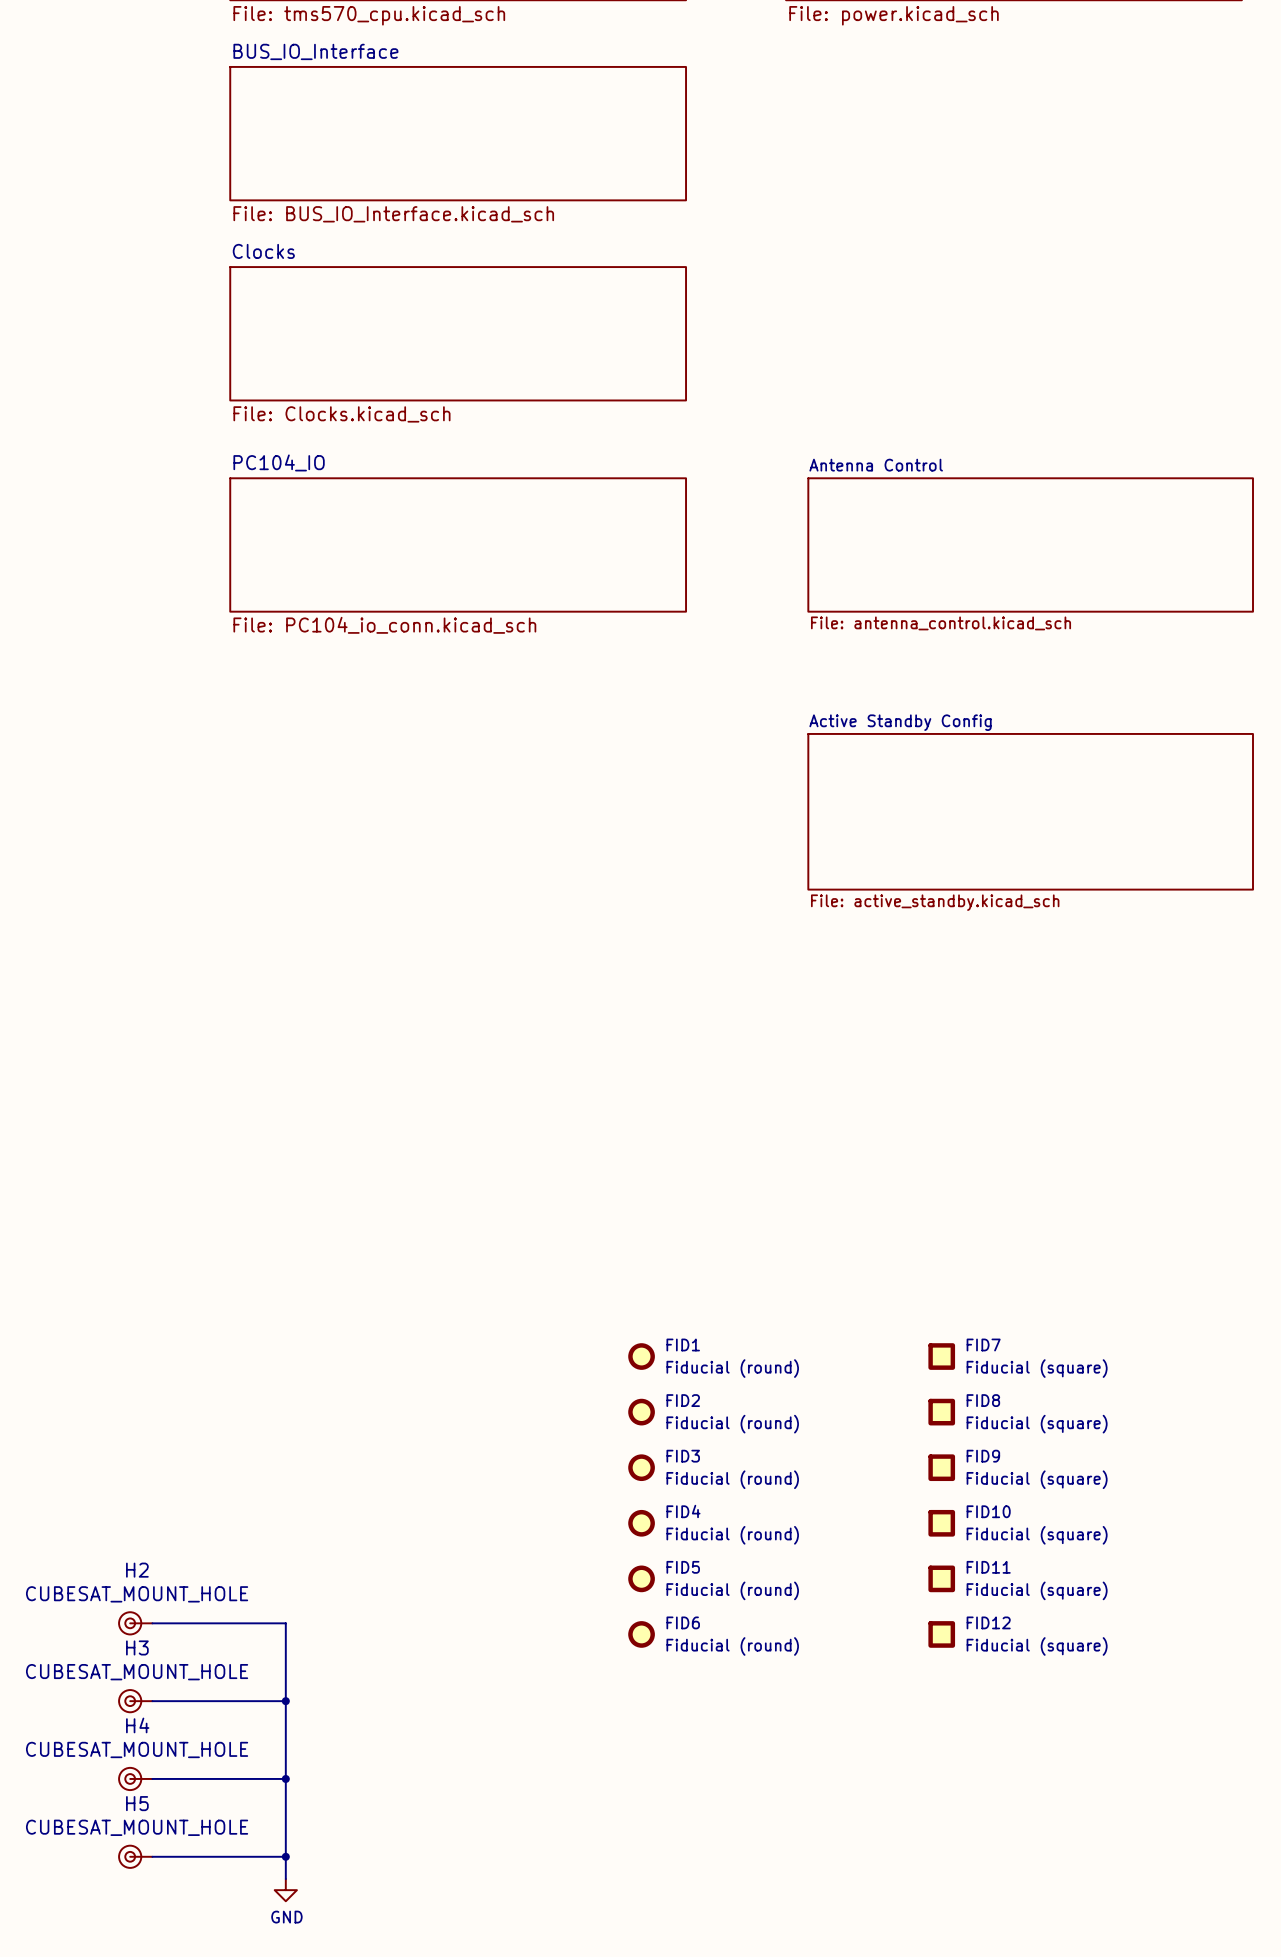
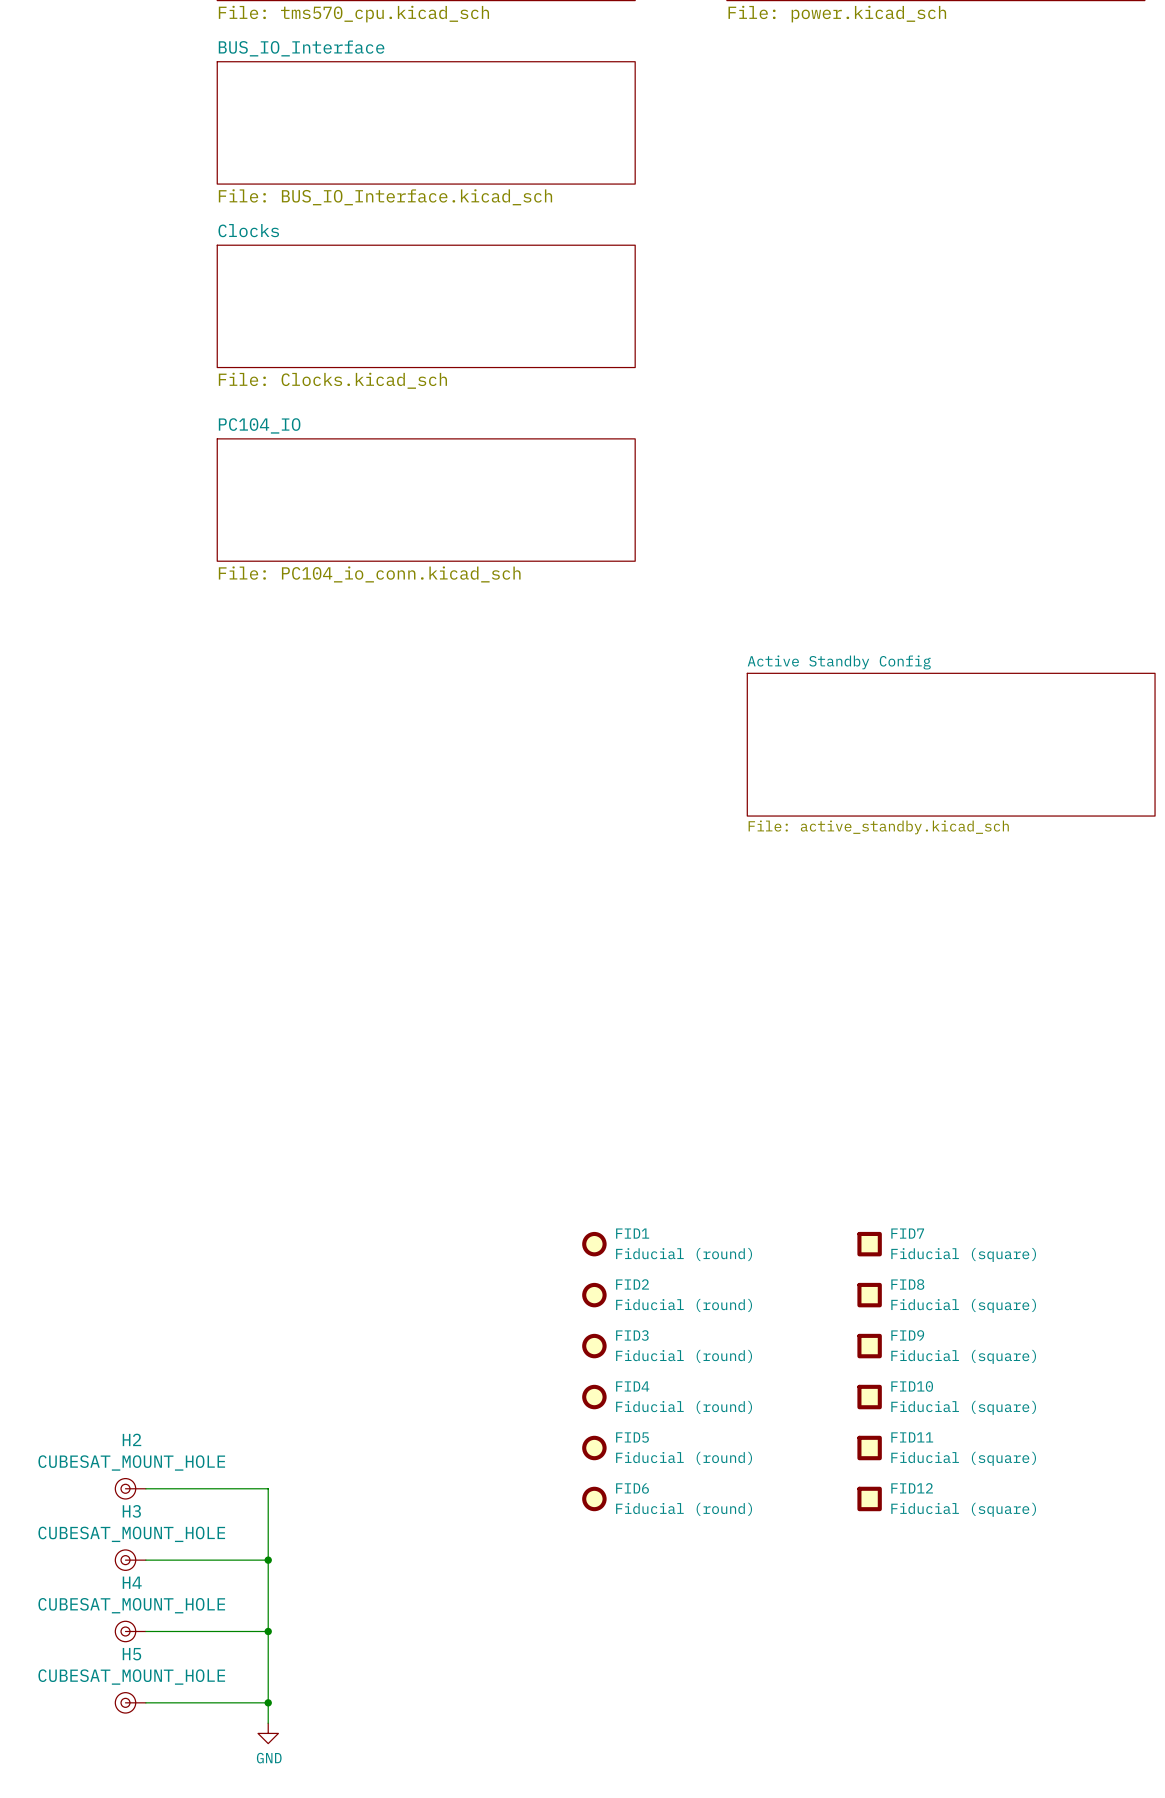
sheet Antenna Control: File: antenna_control.kicad_sch (1030, 544) -> none

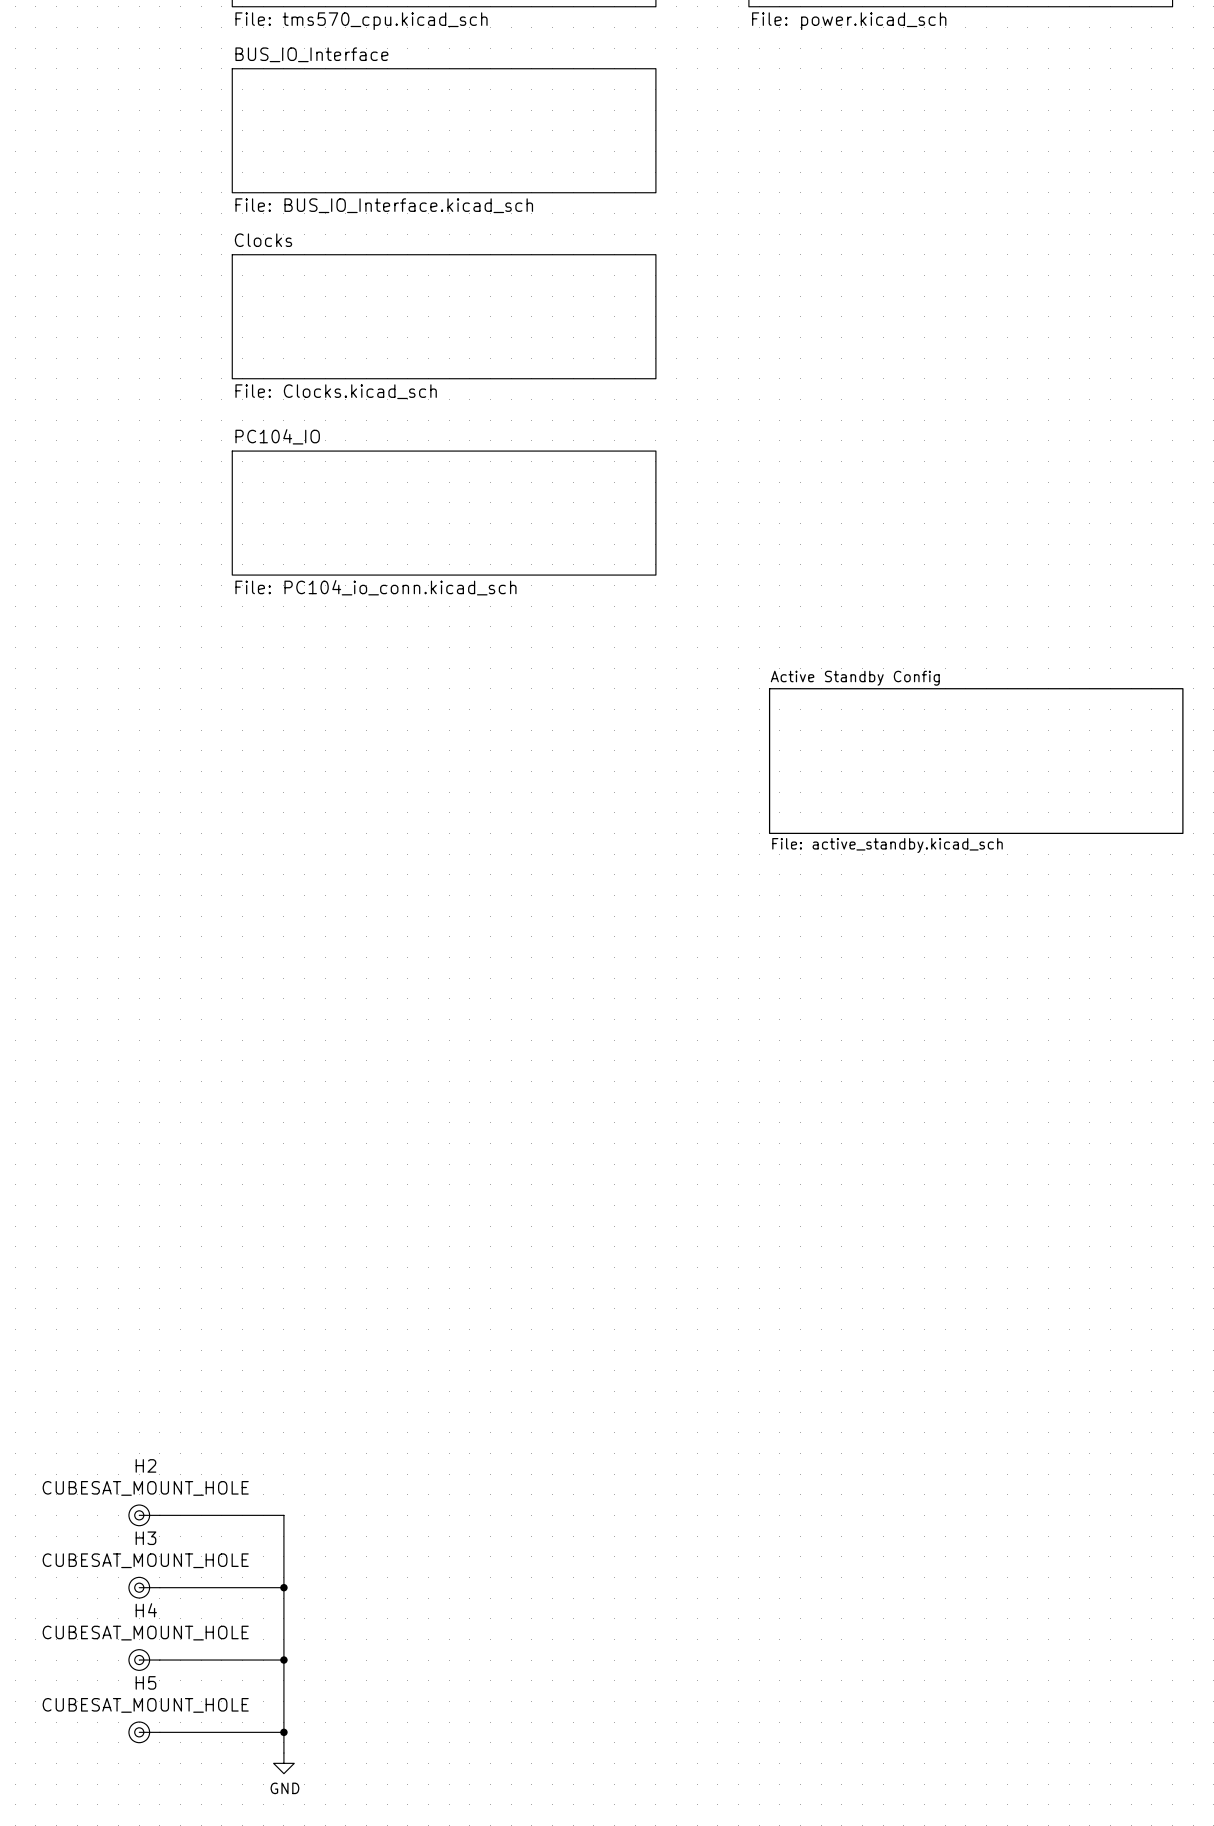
FID1: Fiducial (round) (594, 1244) -> none
FID7: Fiducial (square) (869, 1244) -> none
FID2: Fiducial (round) (594, 1295) -> none
FID8: Fiducial (square) (869, 1295) -> none
FID3: Fiducial (round) (594, 1346) -> none
FID9: Fiducial (square) (869, 1346) -> none
FID4: Fiducial (round) (594, 1397) -> none
FID10: Fiducial (square) (869, 1397) -> none
FID5: Fiducial (round) (594, 1448) -> none
FID11: Fiducial (square) (869, 1448) -> none
FID6: Fiducial (round) (594, 1498) -> none
FID12: Fiducial (square) (869, 1498) -> none

